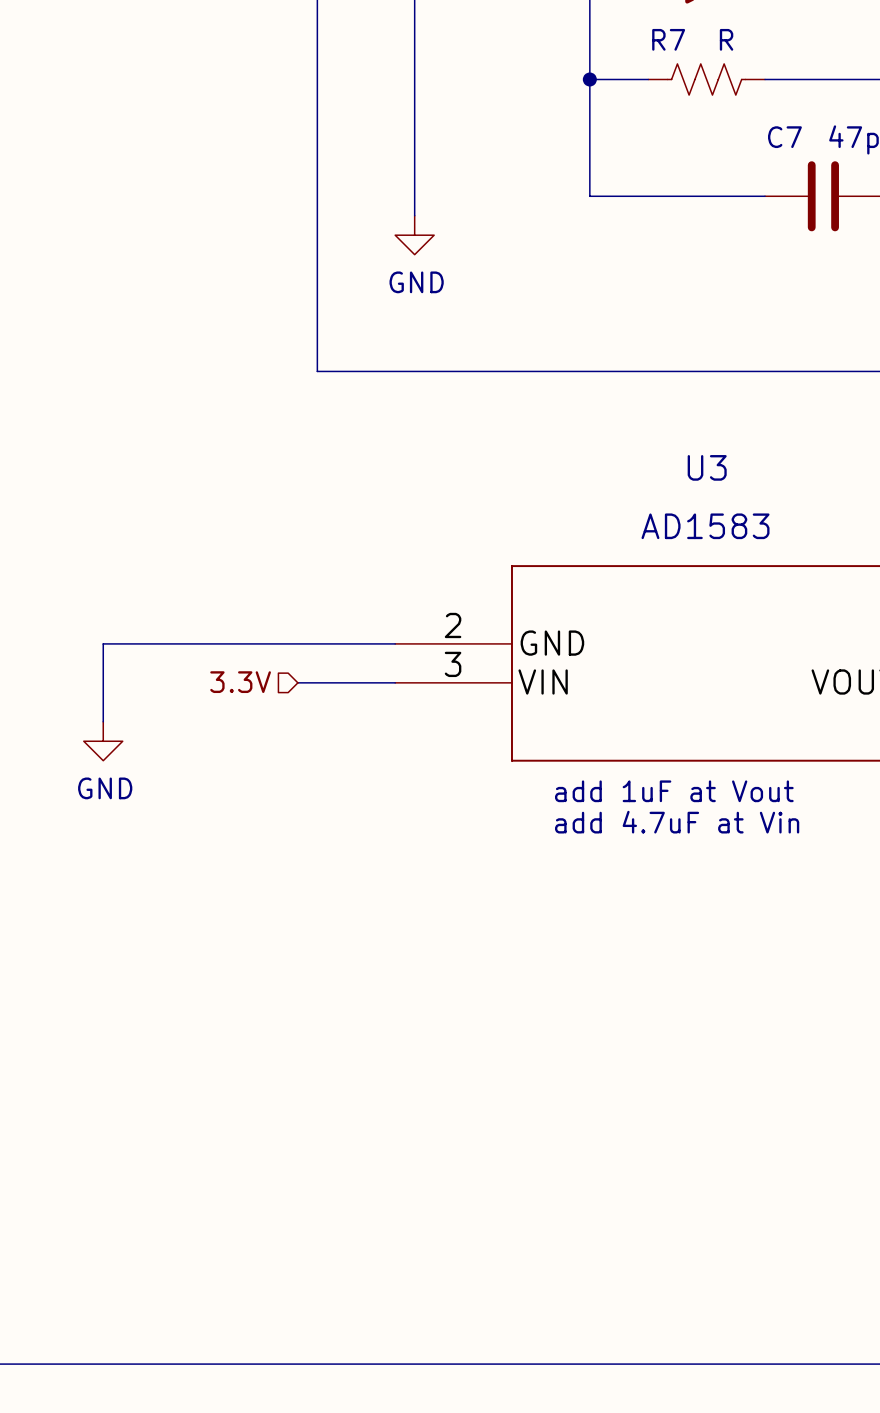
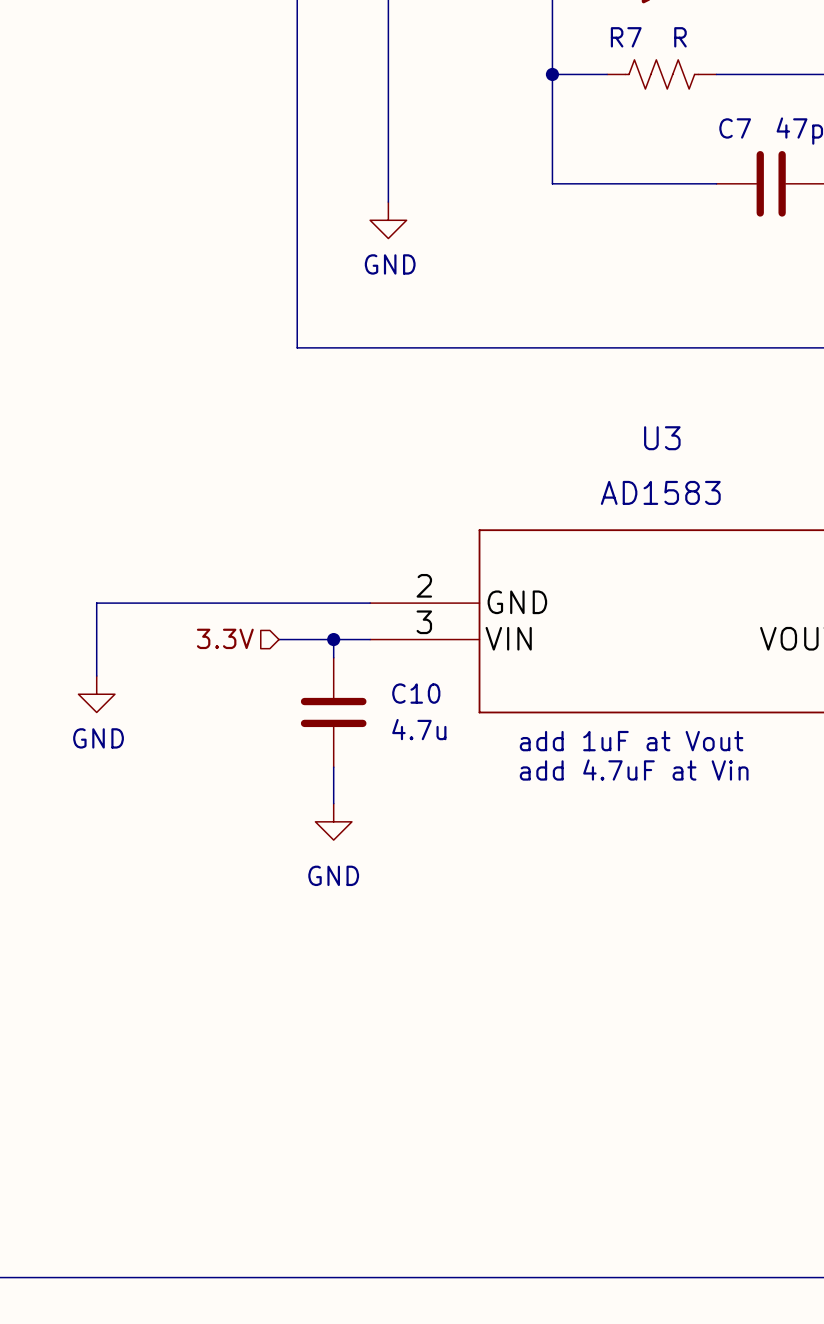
wire: none -> (333, 639) (333, 657)
junction: none -> (333, 639)
C10: none -> 4.7u (333, 712)
wire: none -> (333, 767) (333, 803)
power symbol: none -> GND (333, 821)

